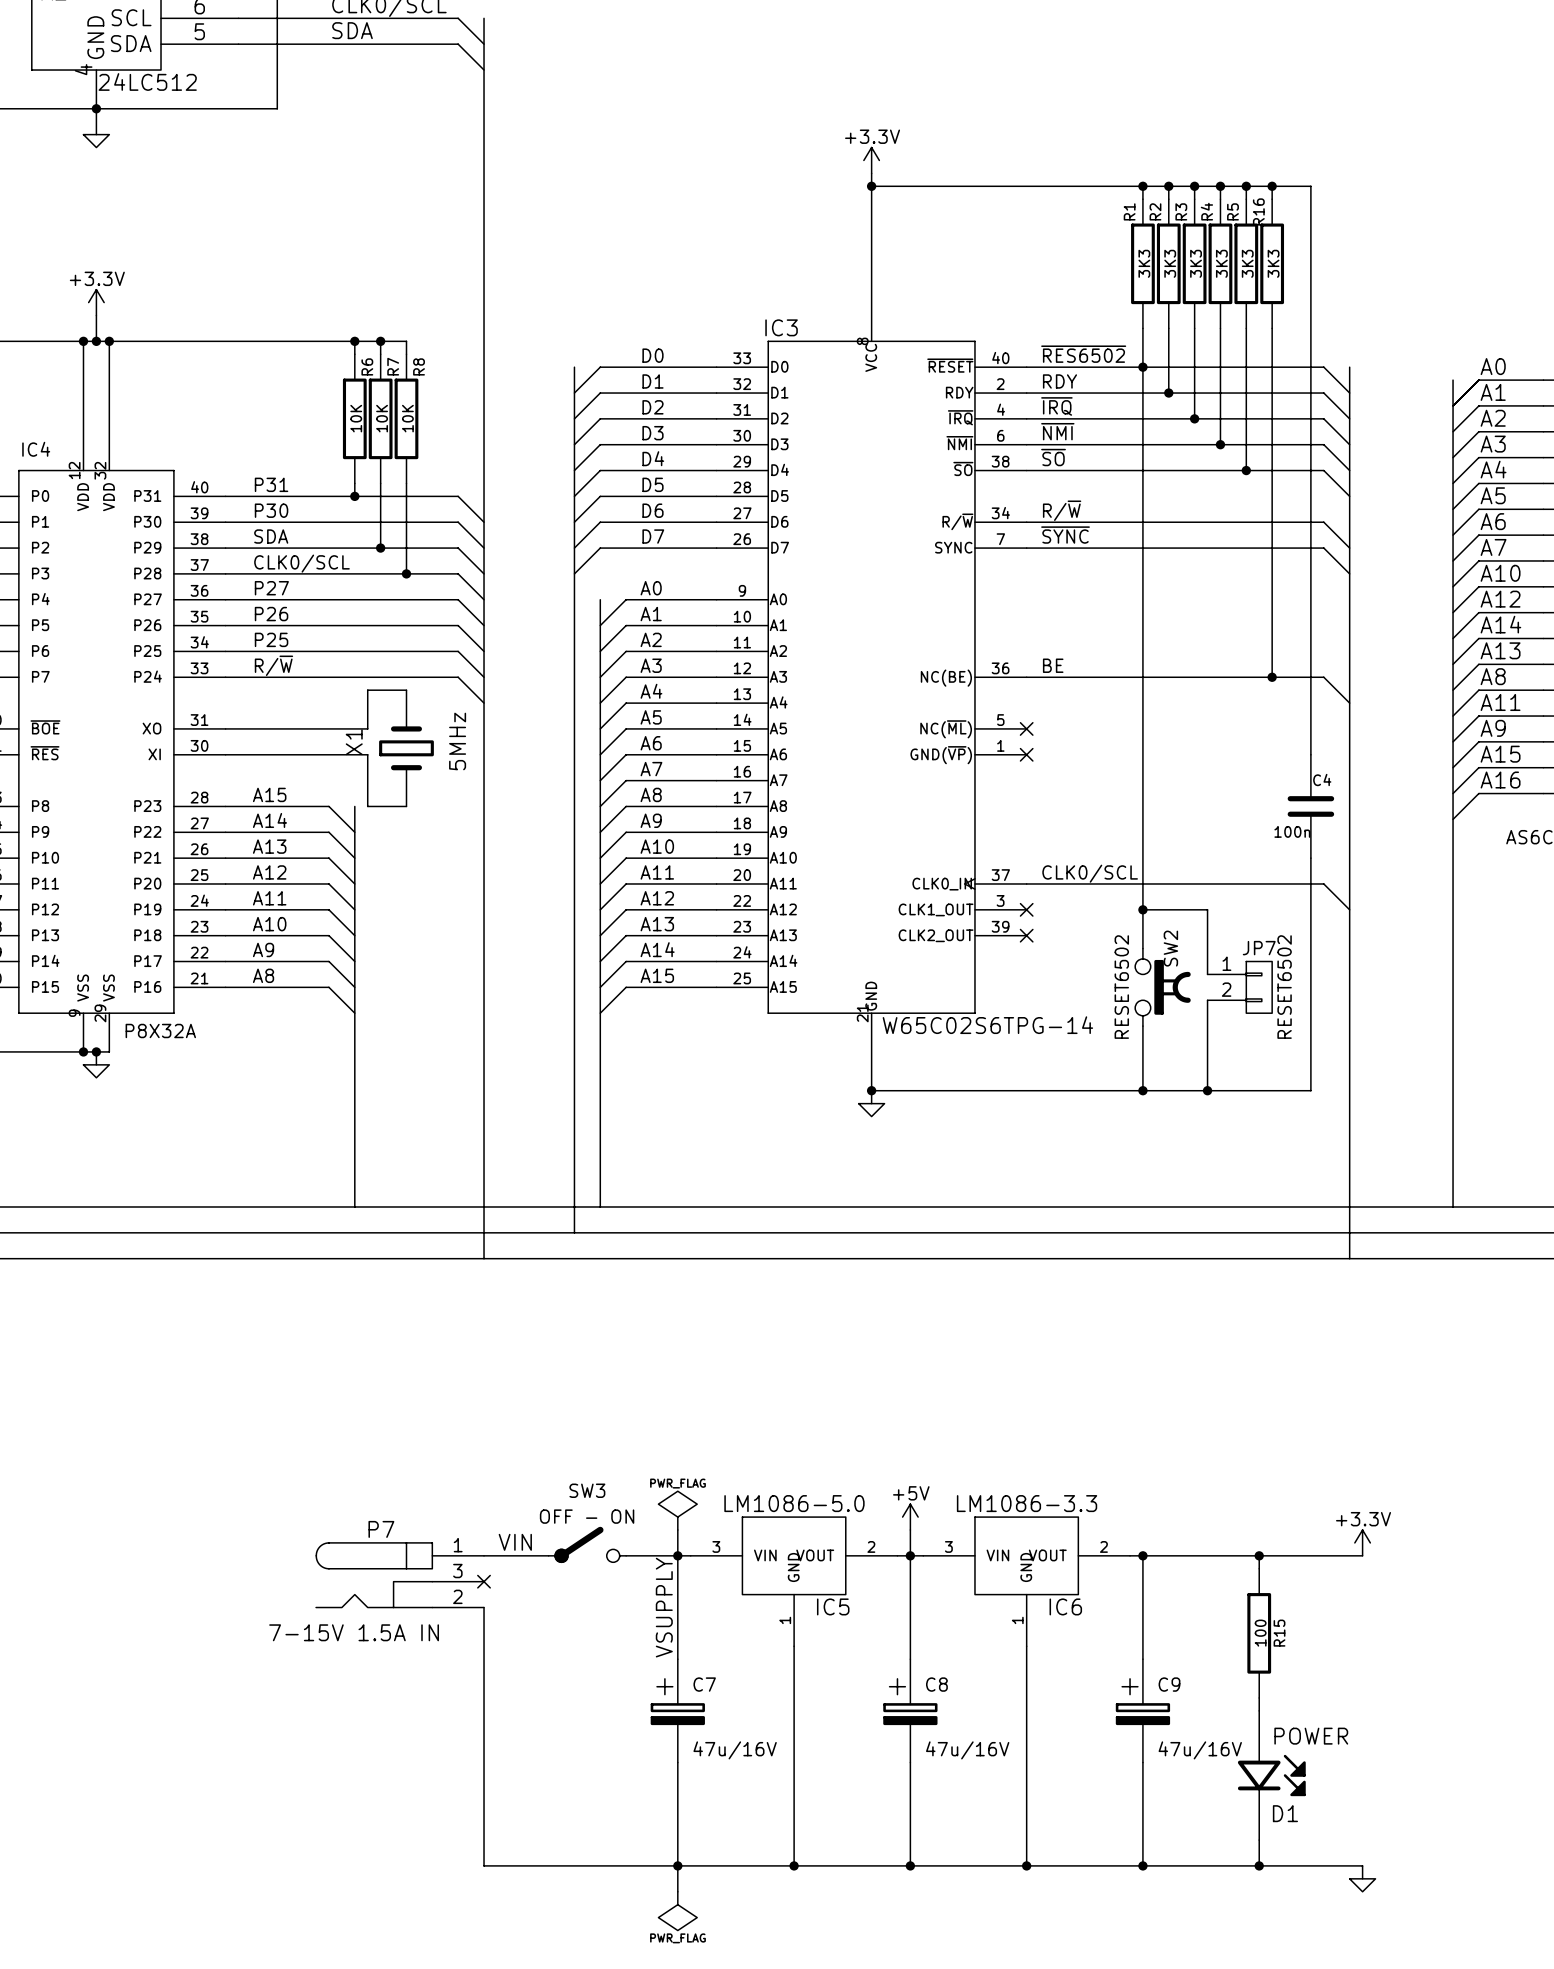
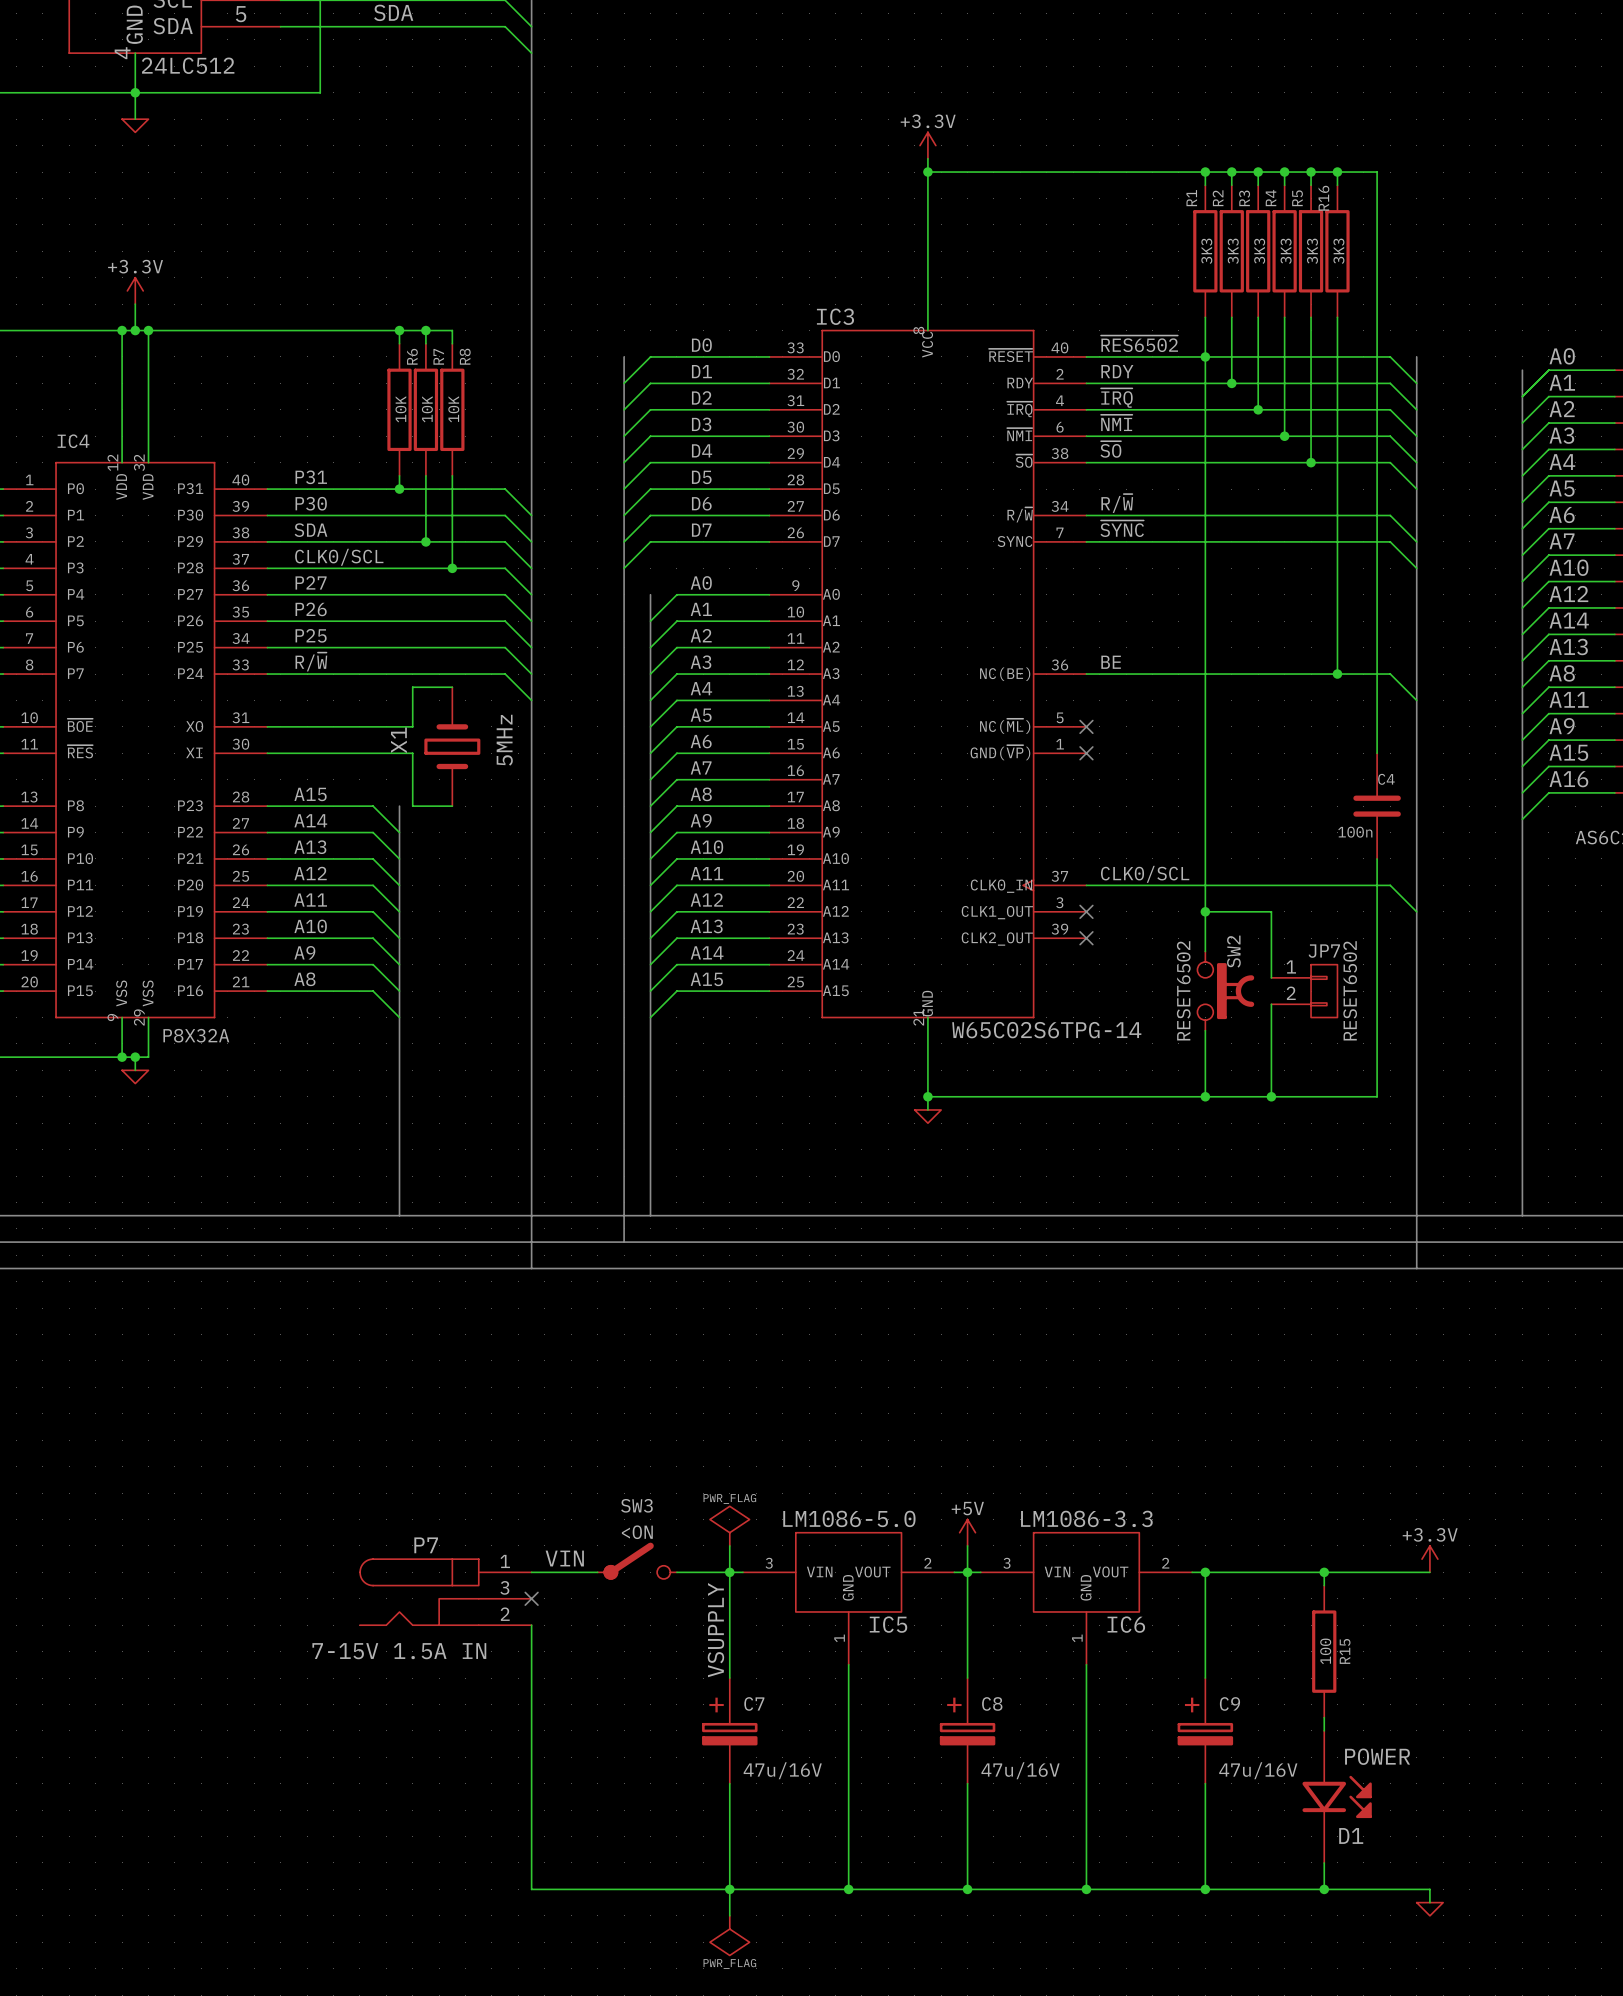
SW3 value: OFF - ON (587, 1516) -> <ON (637, 1532)

